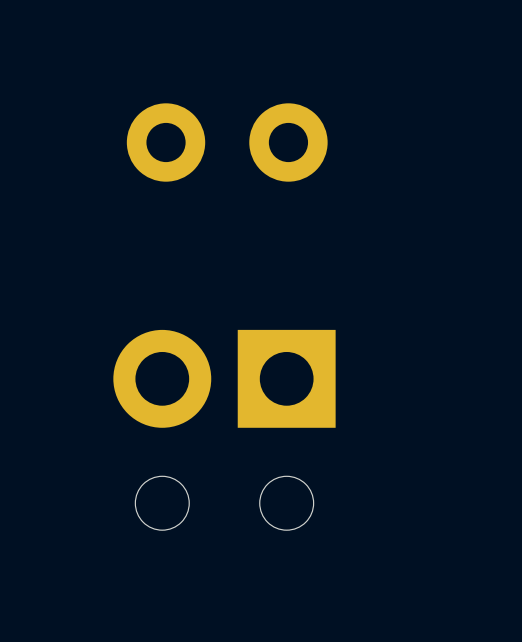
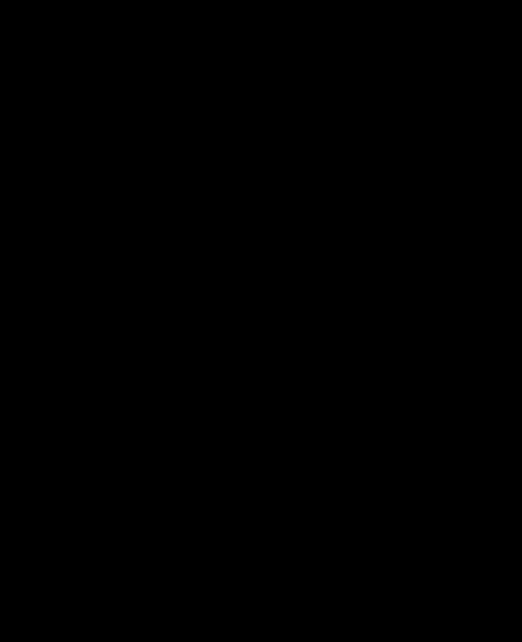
part: (227, 142) -> none
part: (224, 430) -> none

